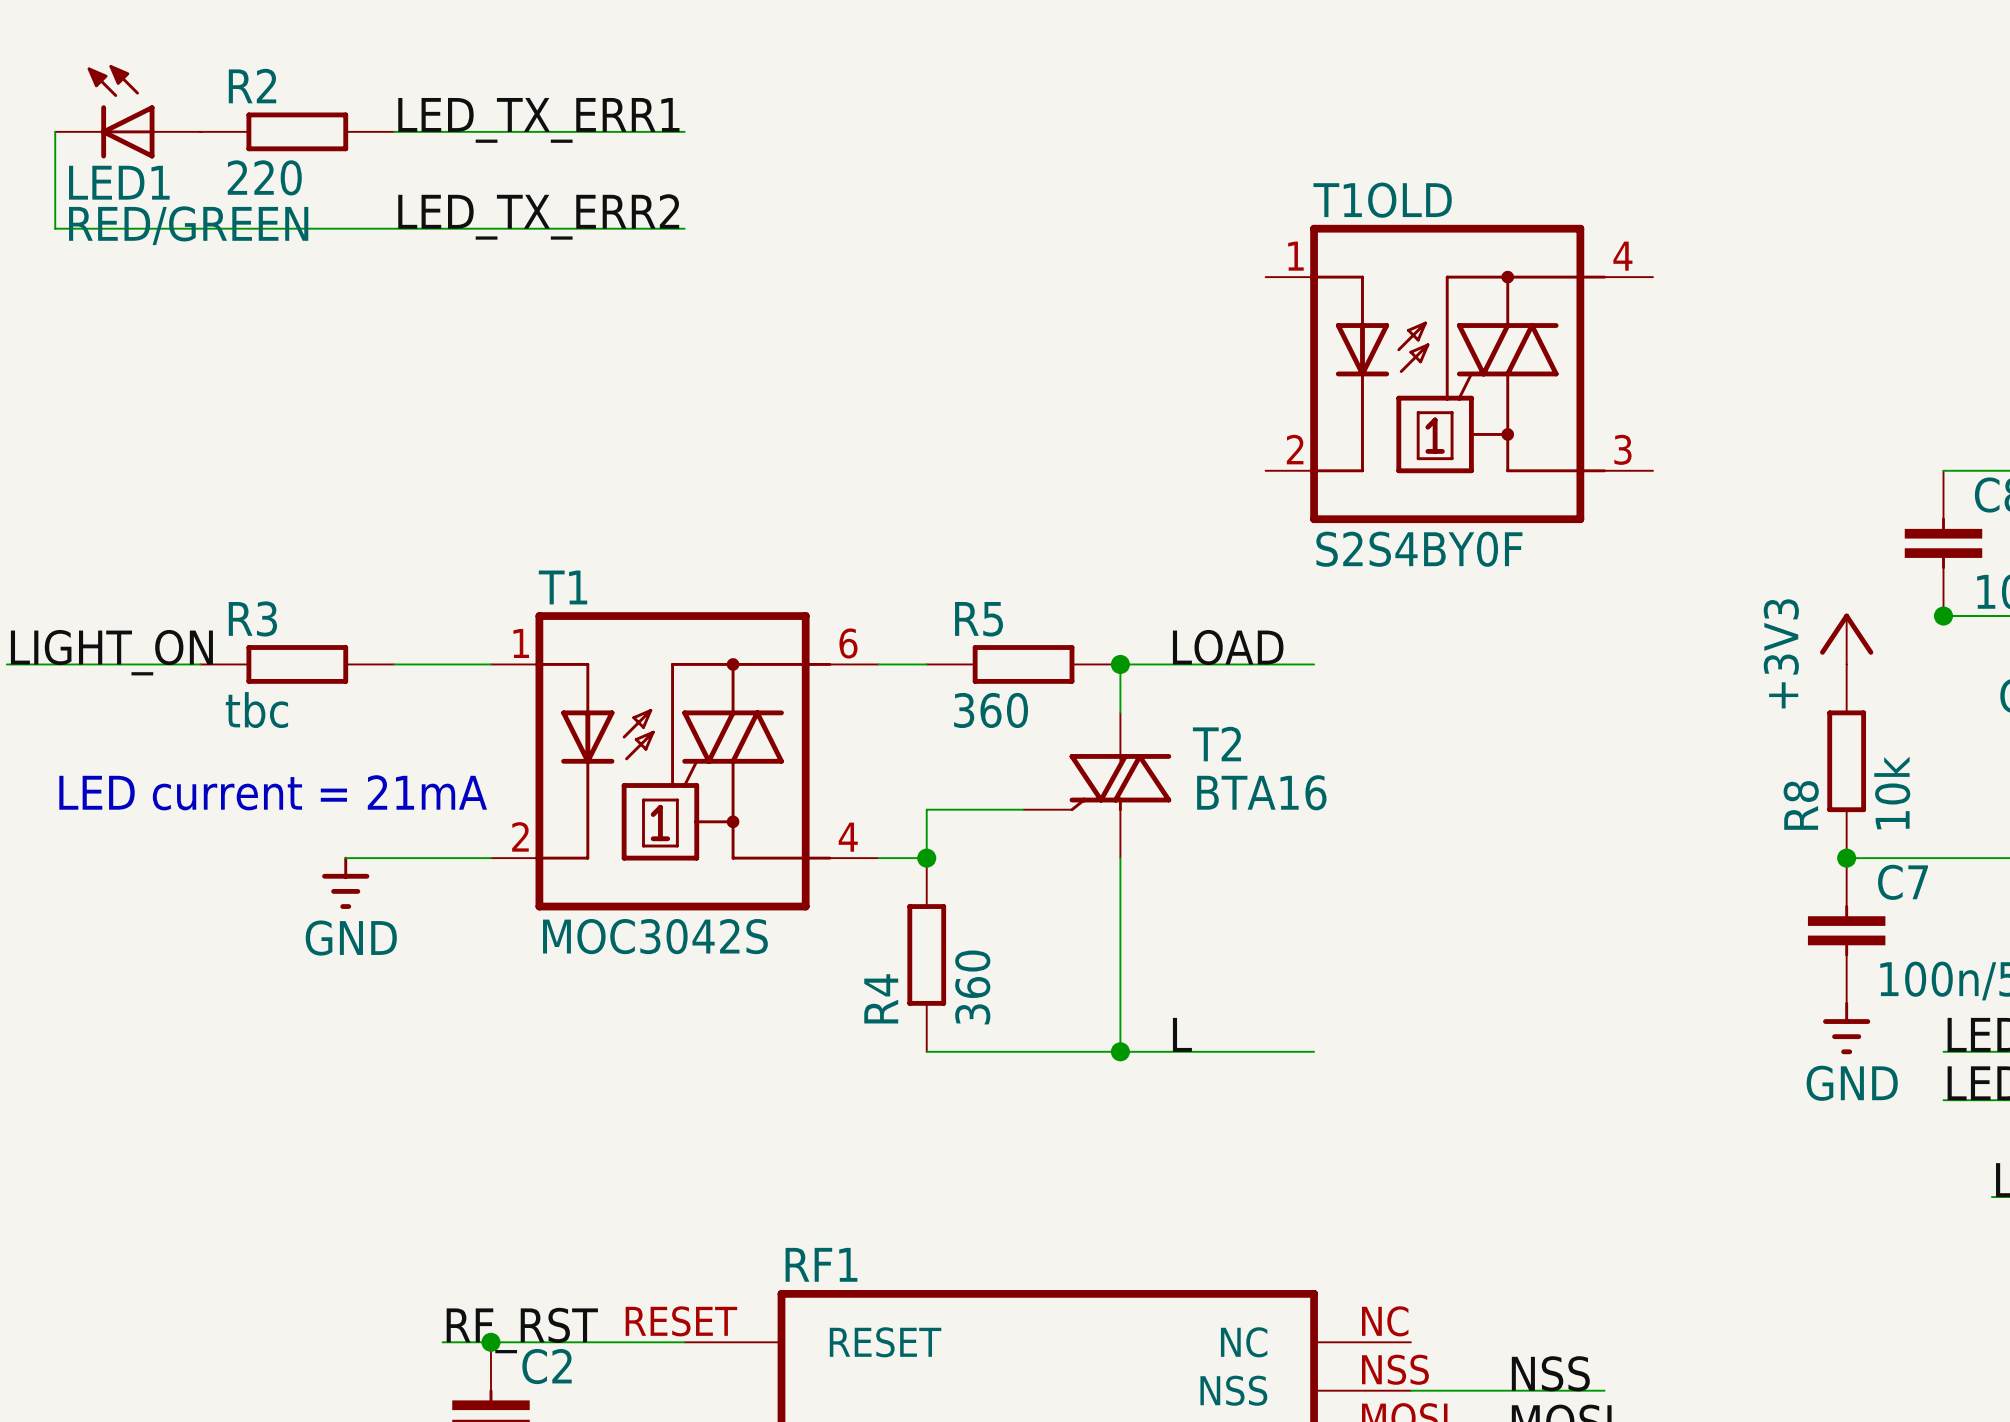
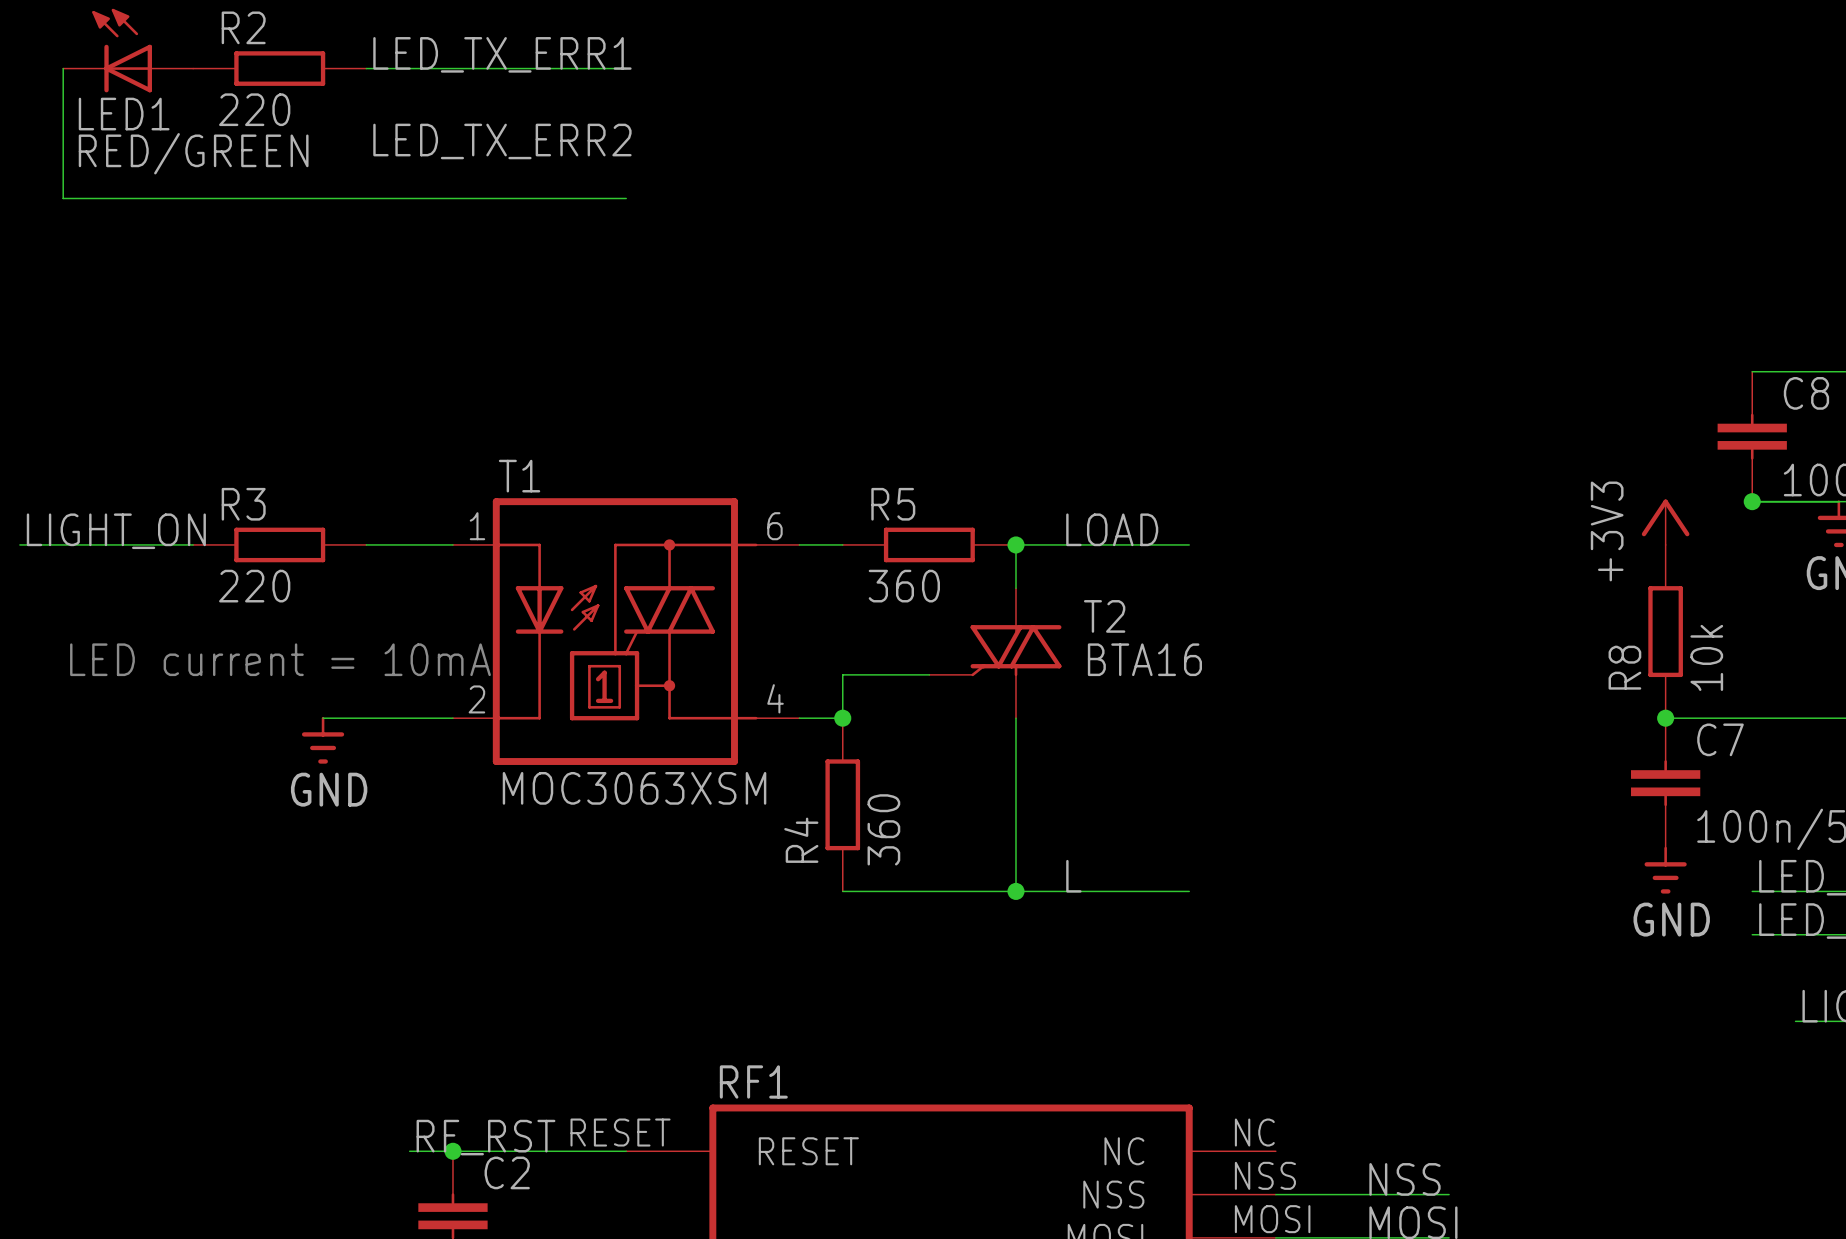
wire: (55, 228) (684, 228) -> (63, 155) (63, 198) (626, 198)
T1OLD: S2S4BY0F (1459, 373) -> none
R3 value: tbc (256, 710) -> 220 (254, 586)
text: LED current = 21mA (273, 792) -> LED current = 10mA (280, 659)
T1 value: MOC3042S (655, 936) -> MOC3063XSM (634, 788)

